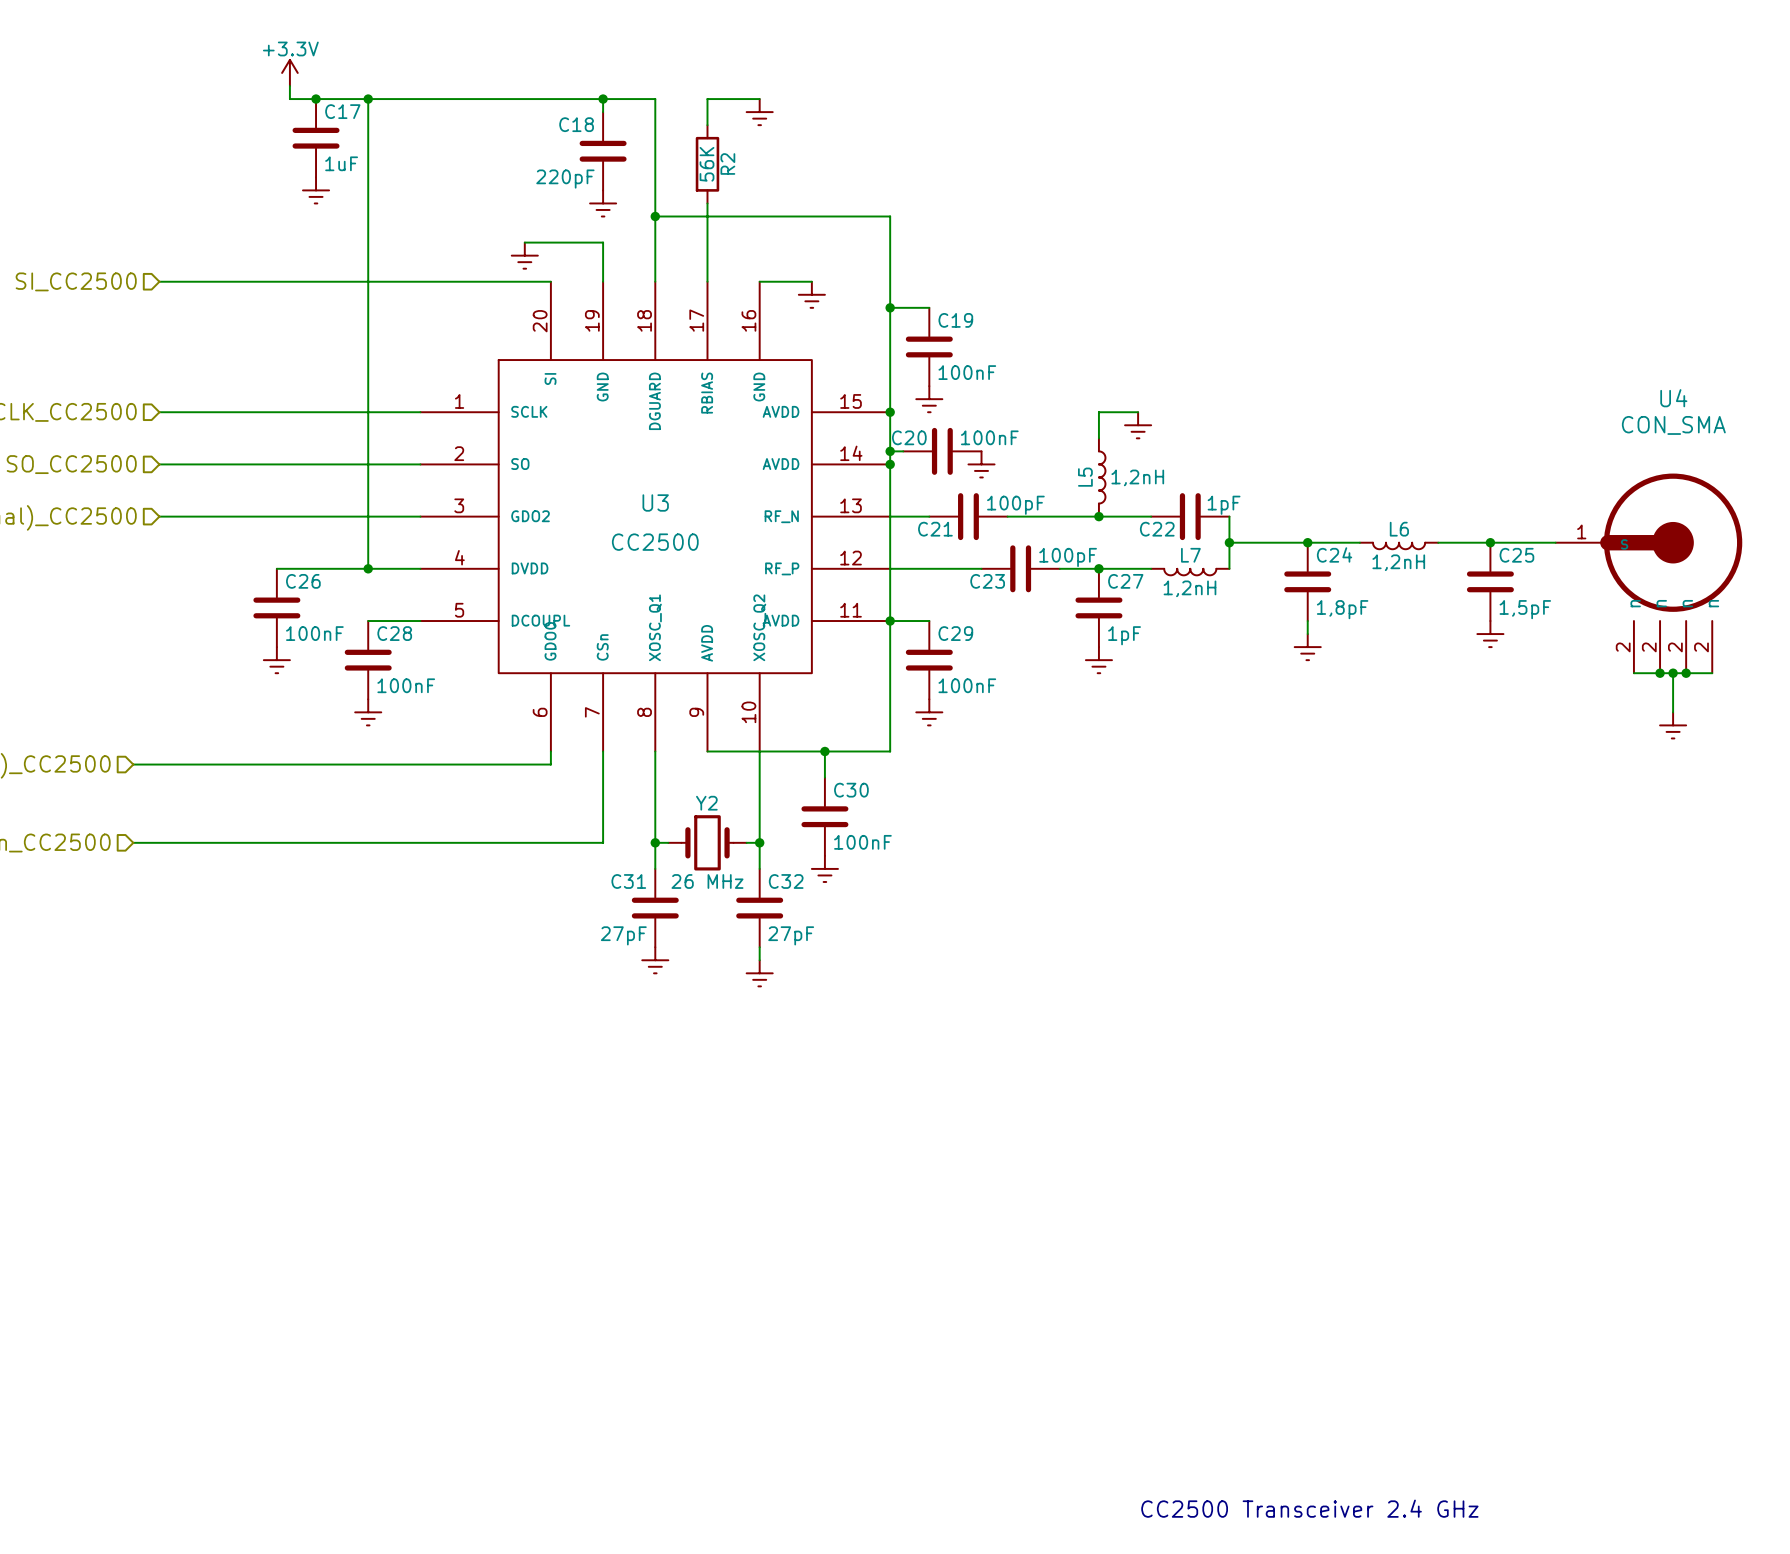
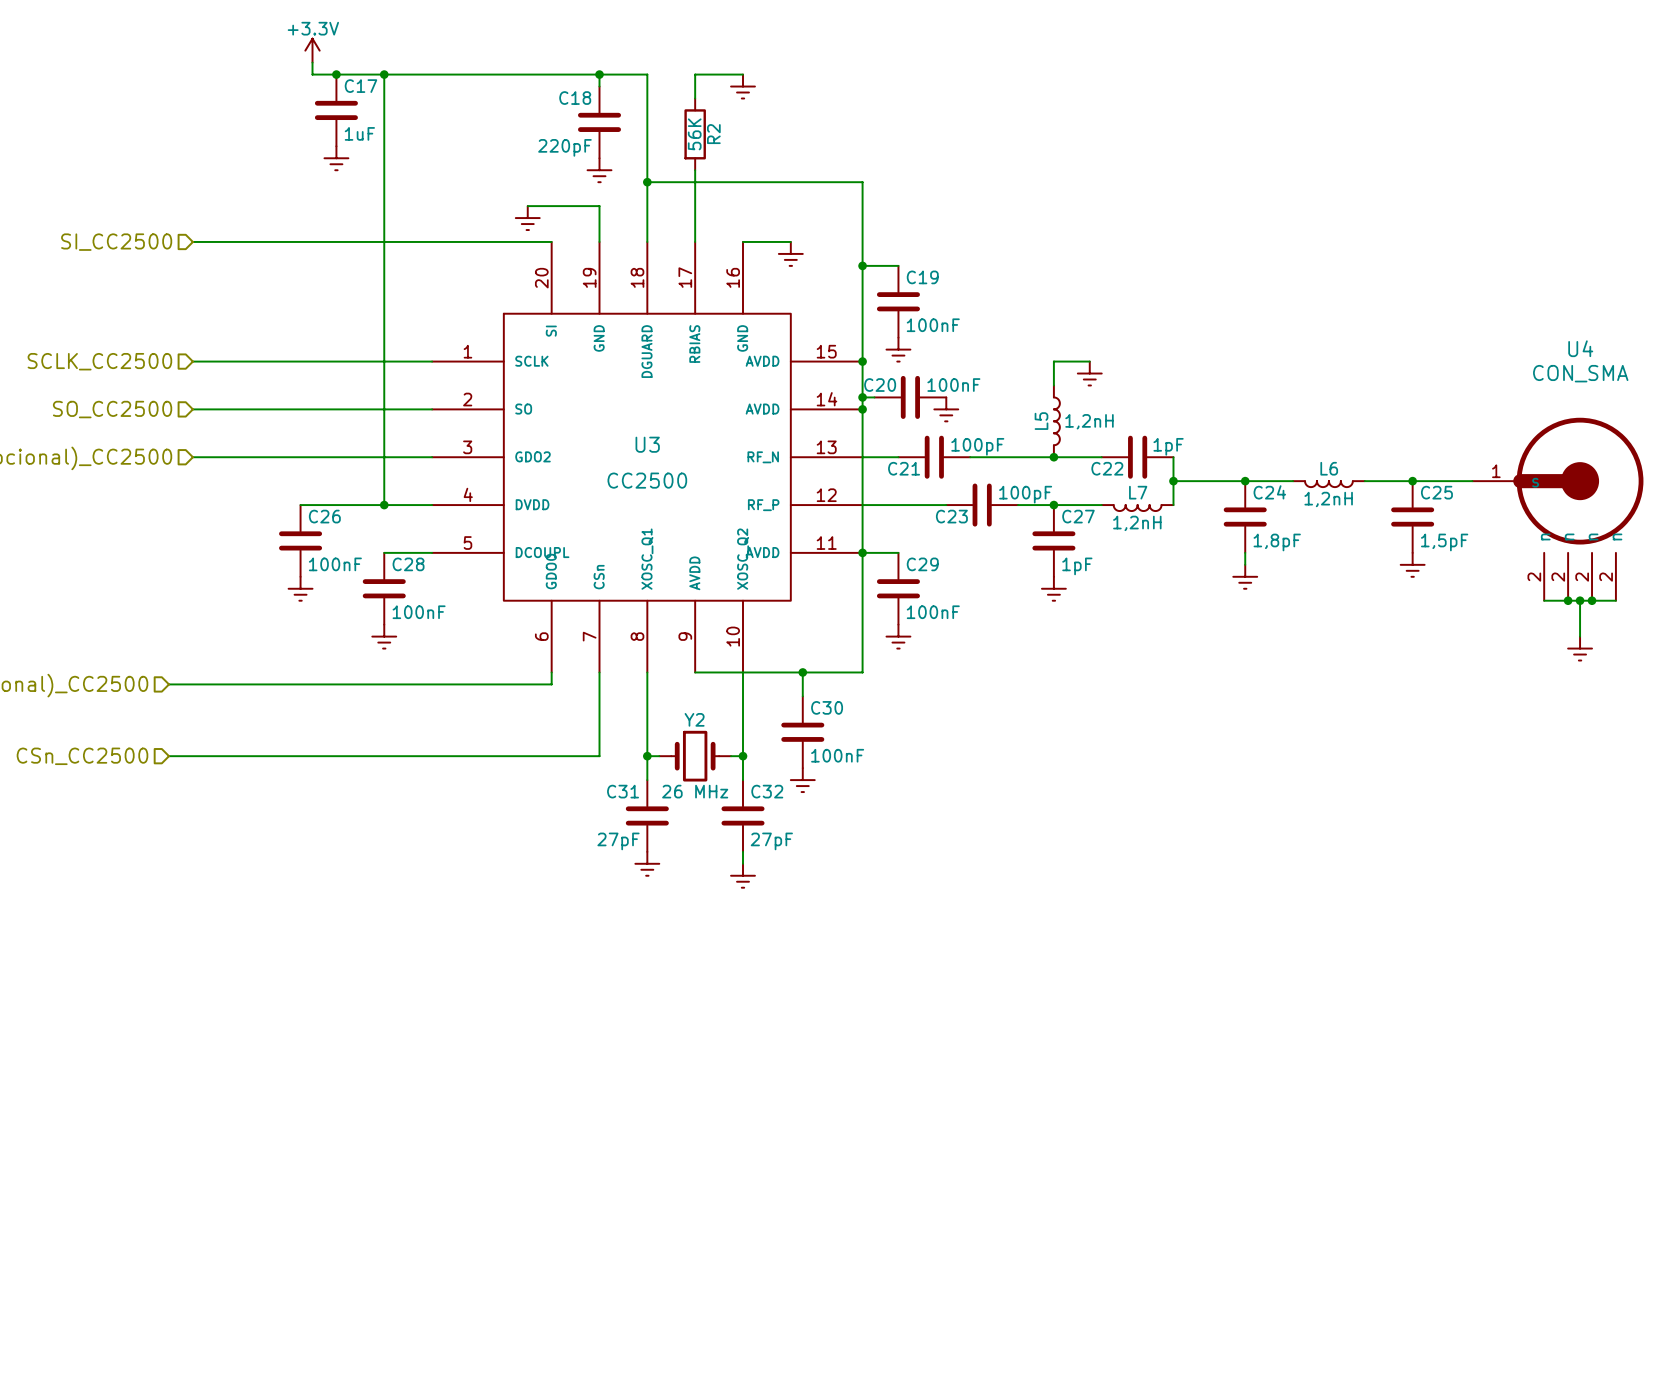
text: CC2500 Transceiver 2.4 GHz (1309, 1508) -> none

